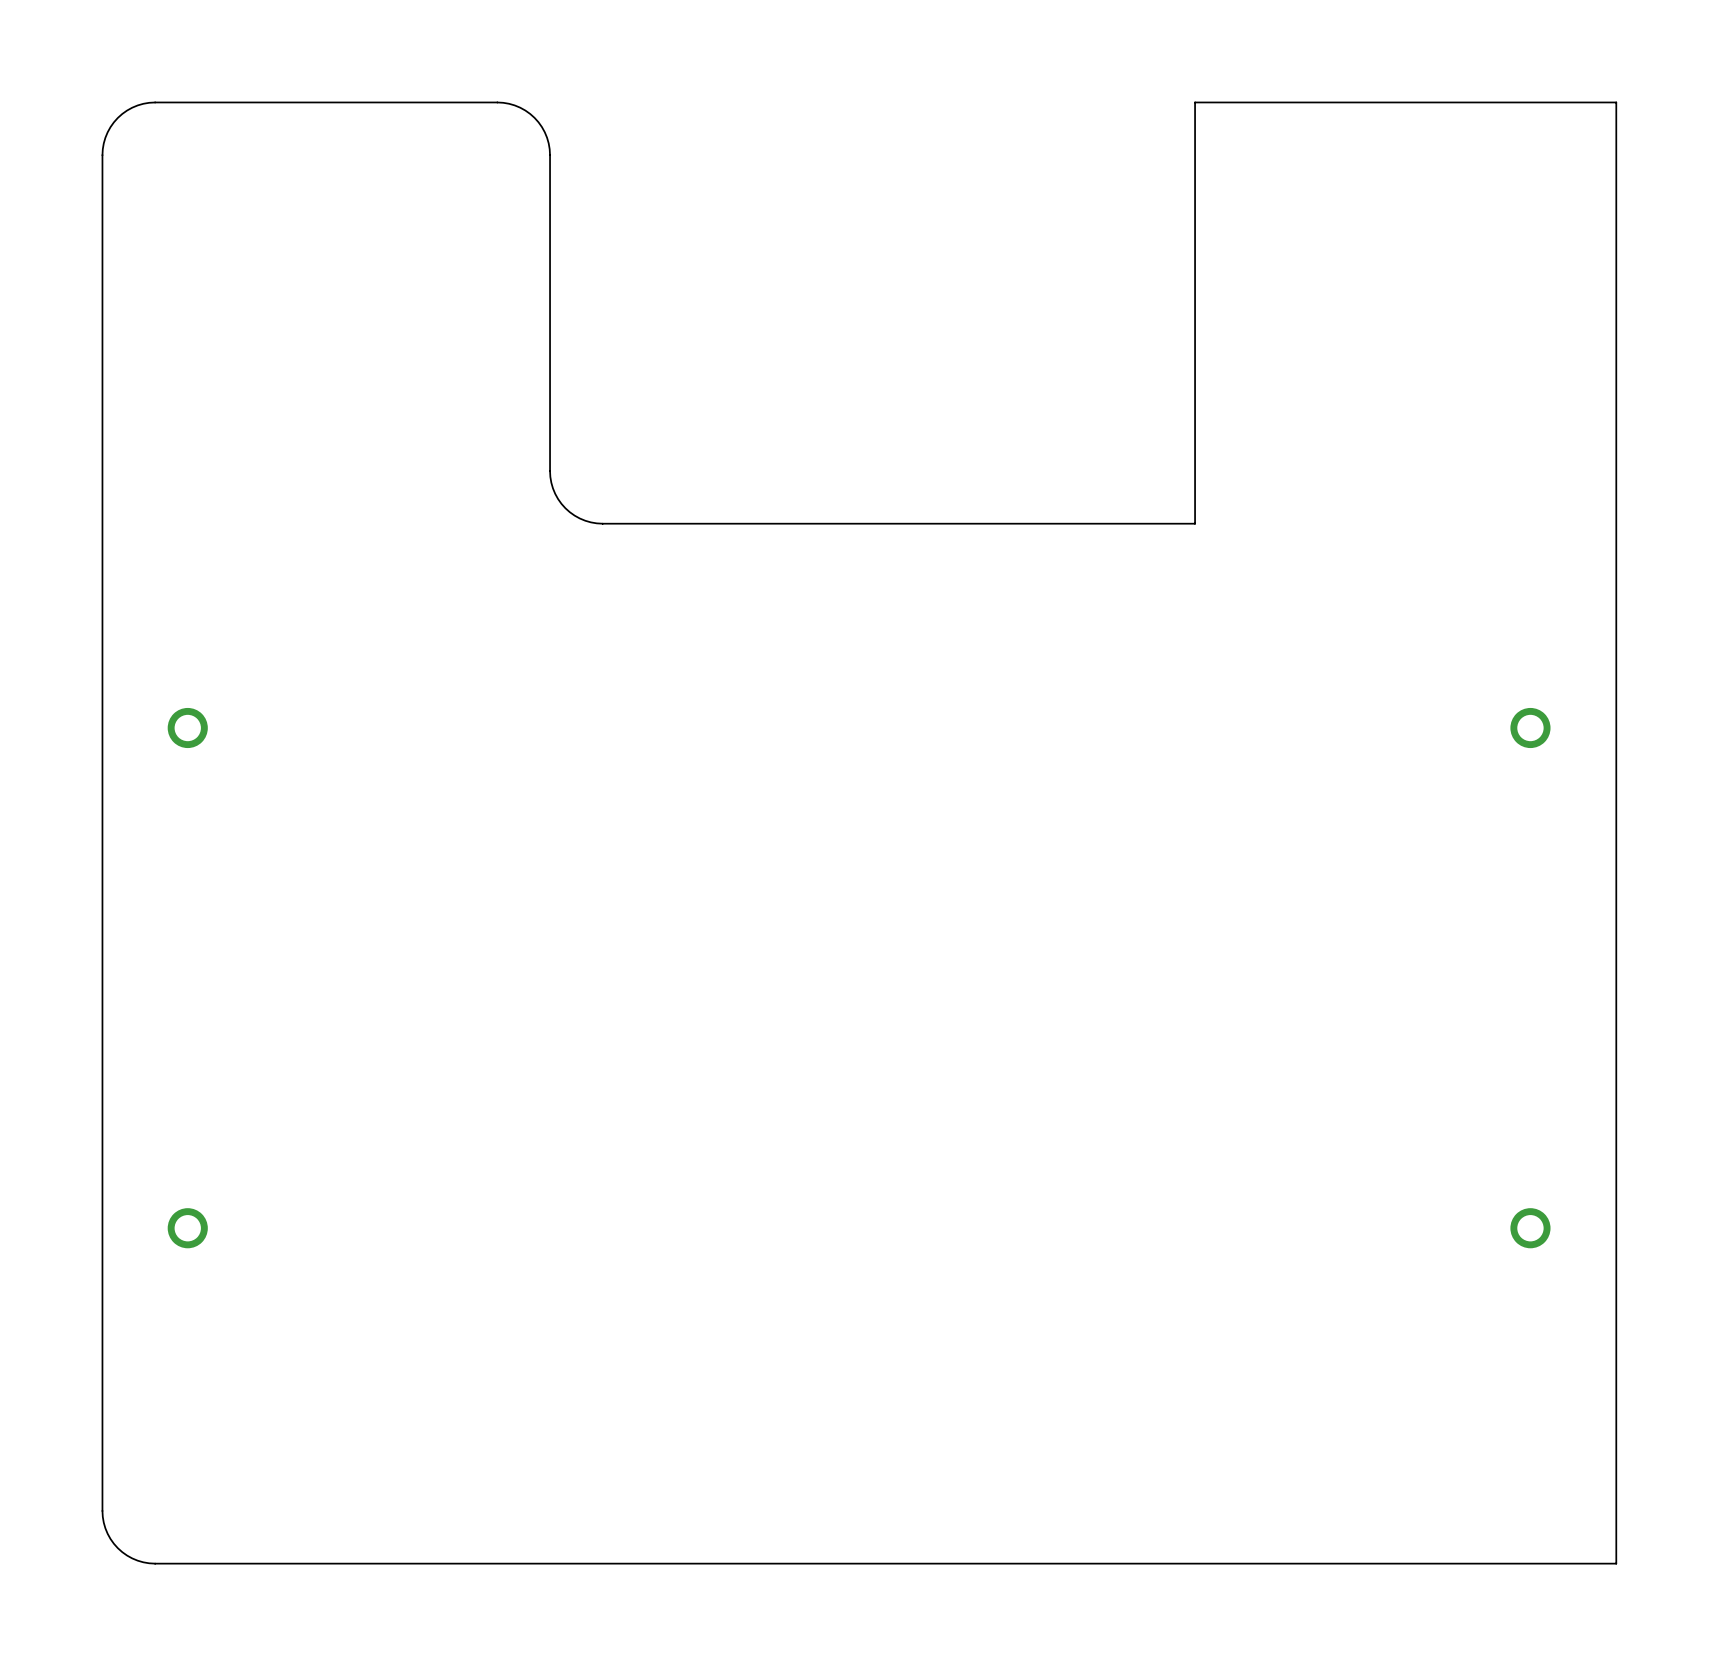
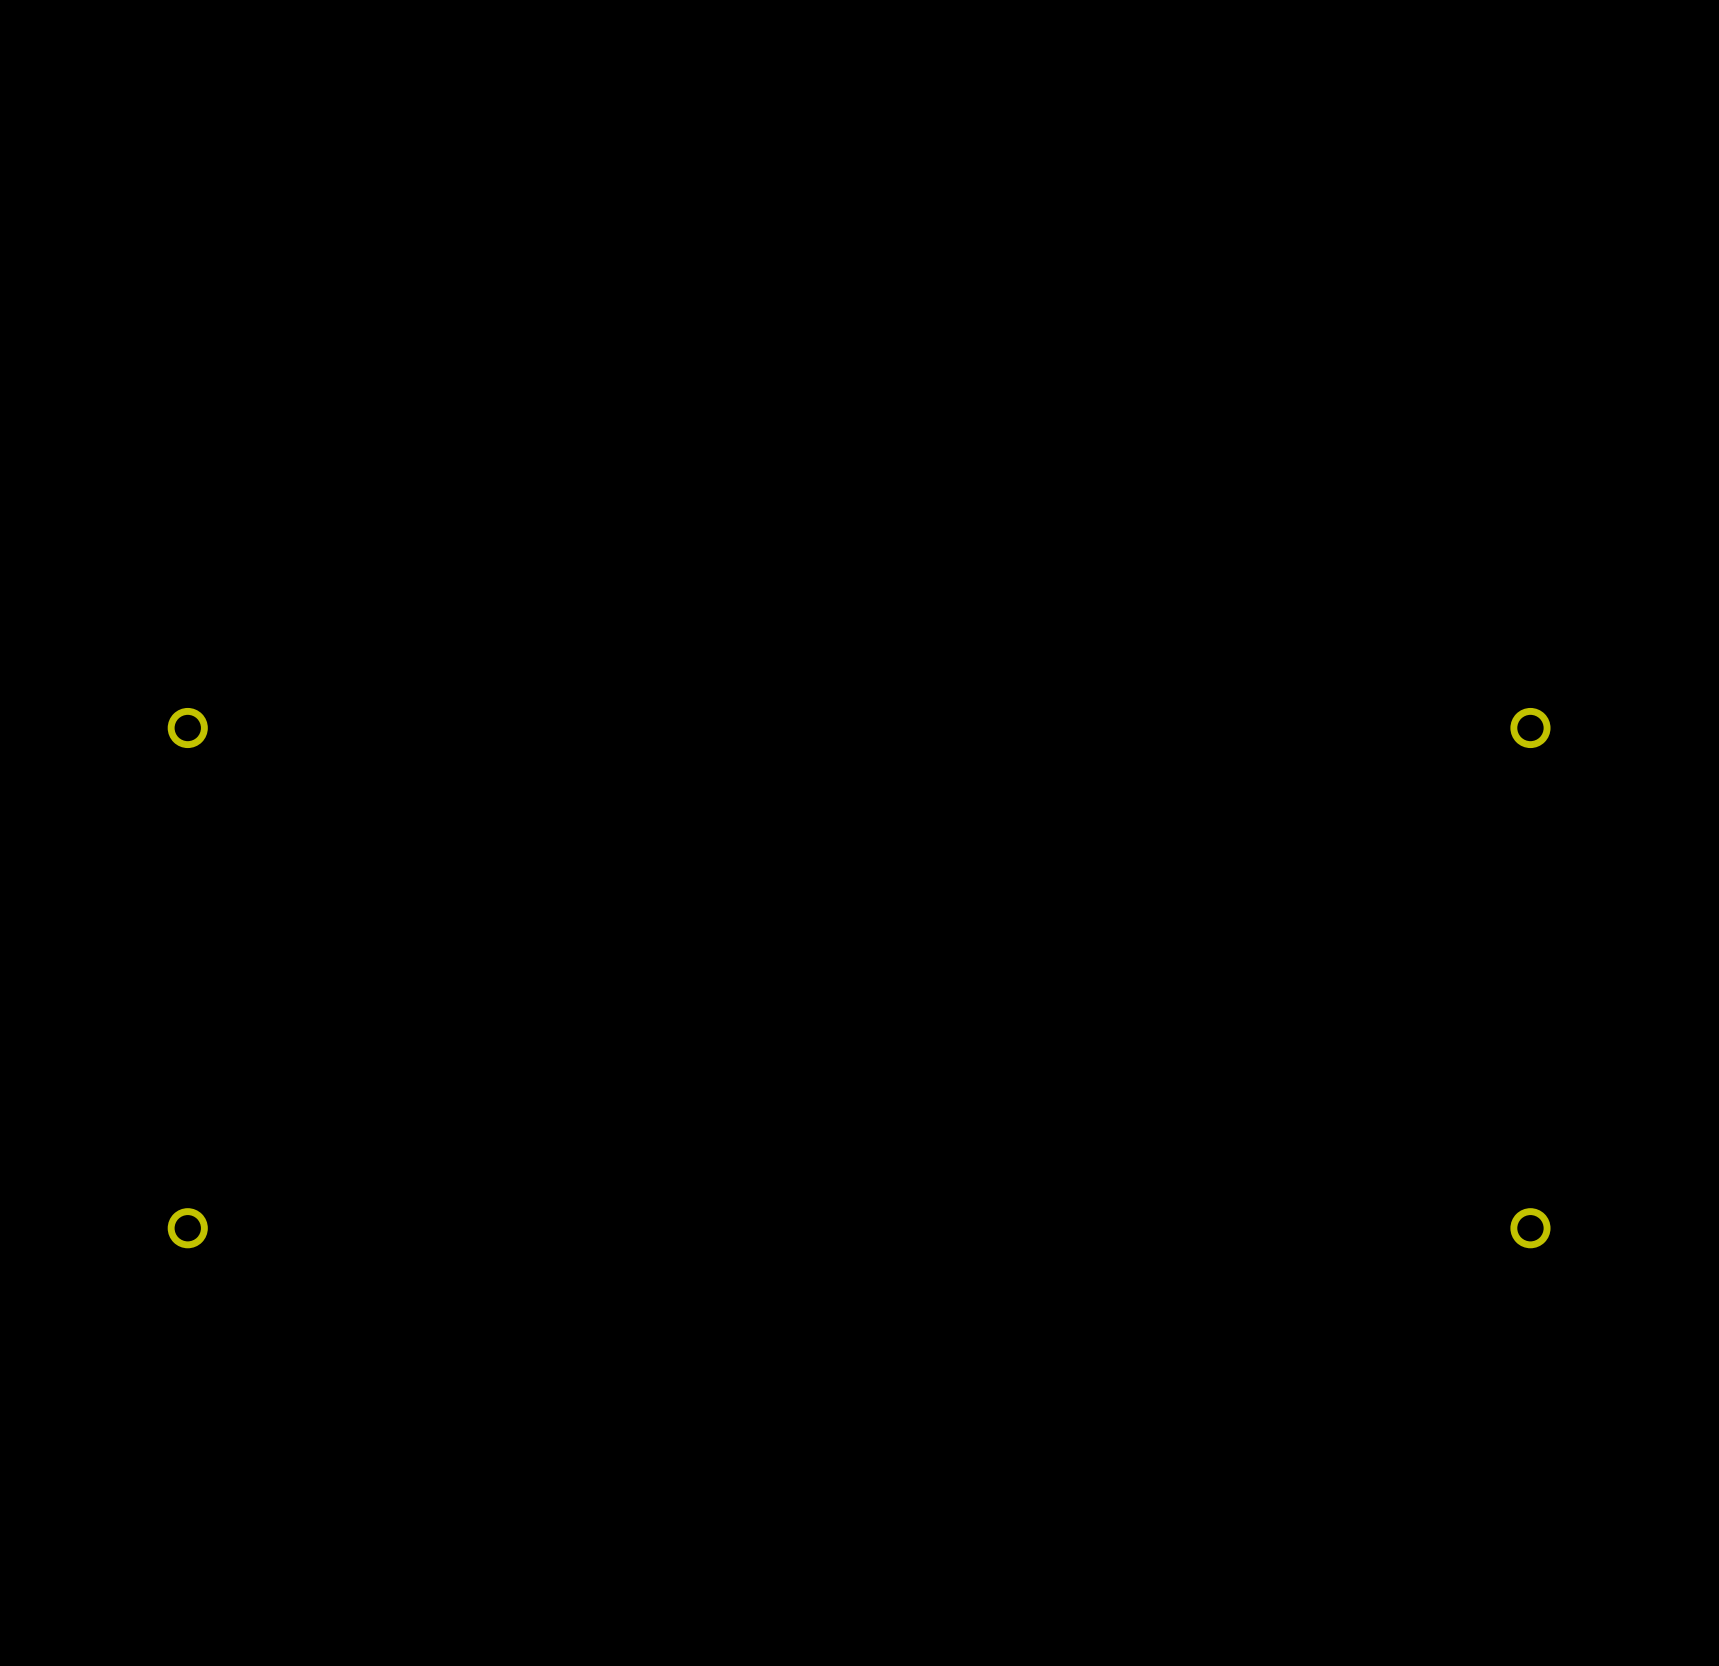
board edge: (1616, 102) (1195, 102) (1195, 523) (602, 523) (585, 520) (574, 515) (561, 503) (555, 493) (550, 476) (550, 155) (544, 132) (530, 113) (514, 105) (497, 102) (155, 102) (137, 105) (117, 117) (105, 137) (102, 155) (102, 1510) (105, 1528) (117, 1548) (132, 1558) (155, 1563) (1616, 1563) (1616, 102) -> none

